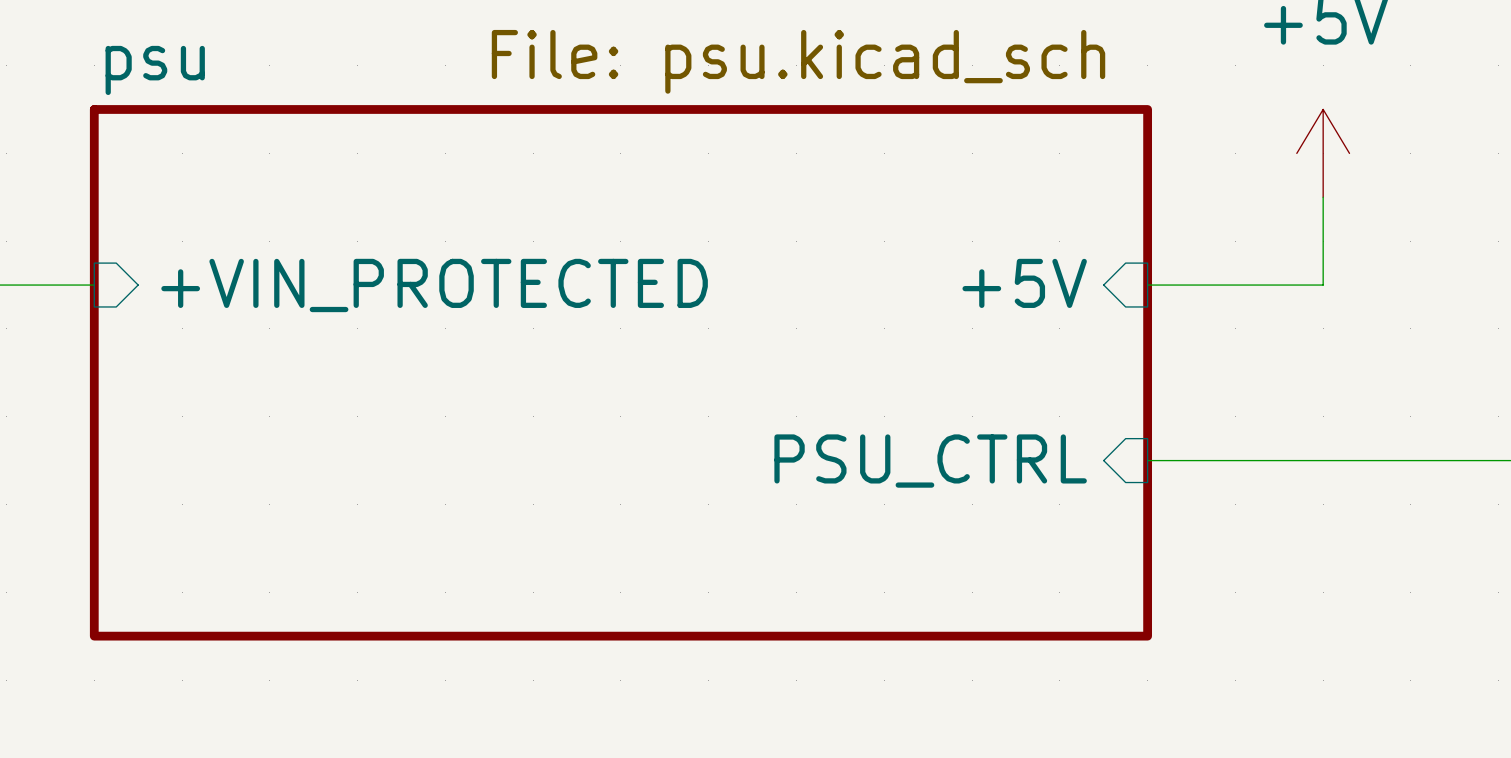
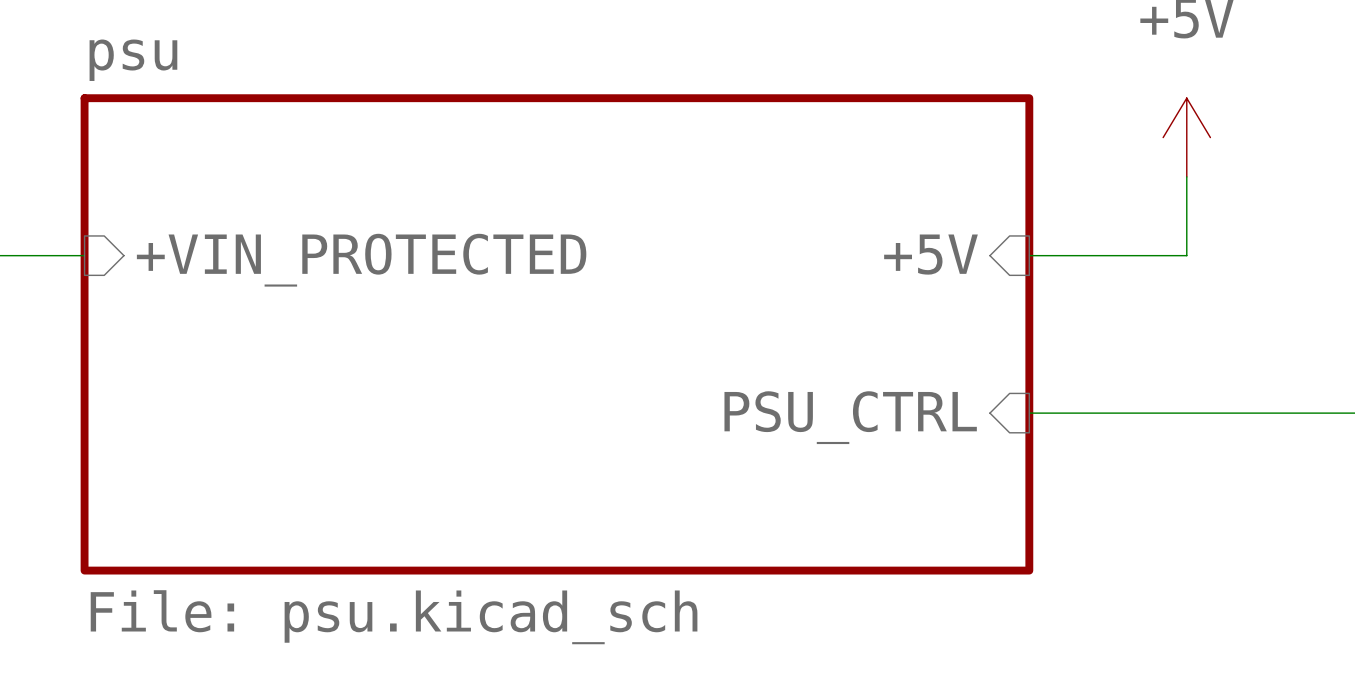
sheet psu value position: File: psu.kicad_sch (798, 61) -> File: psu.kicad_sch (394, 617)

